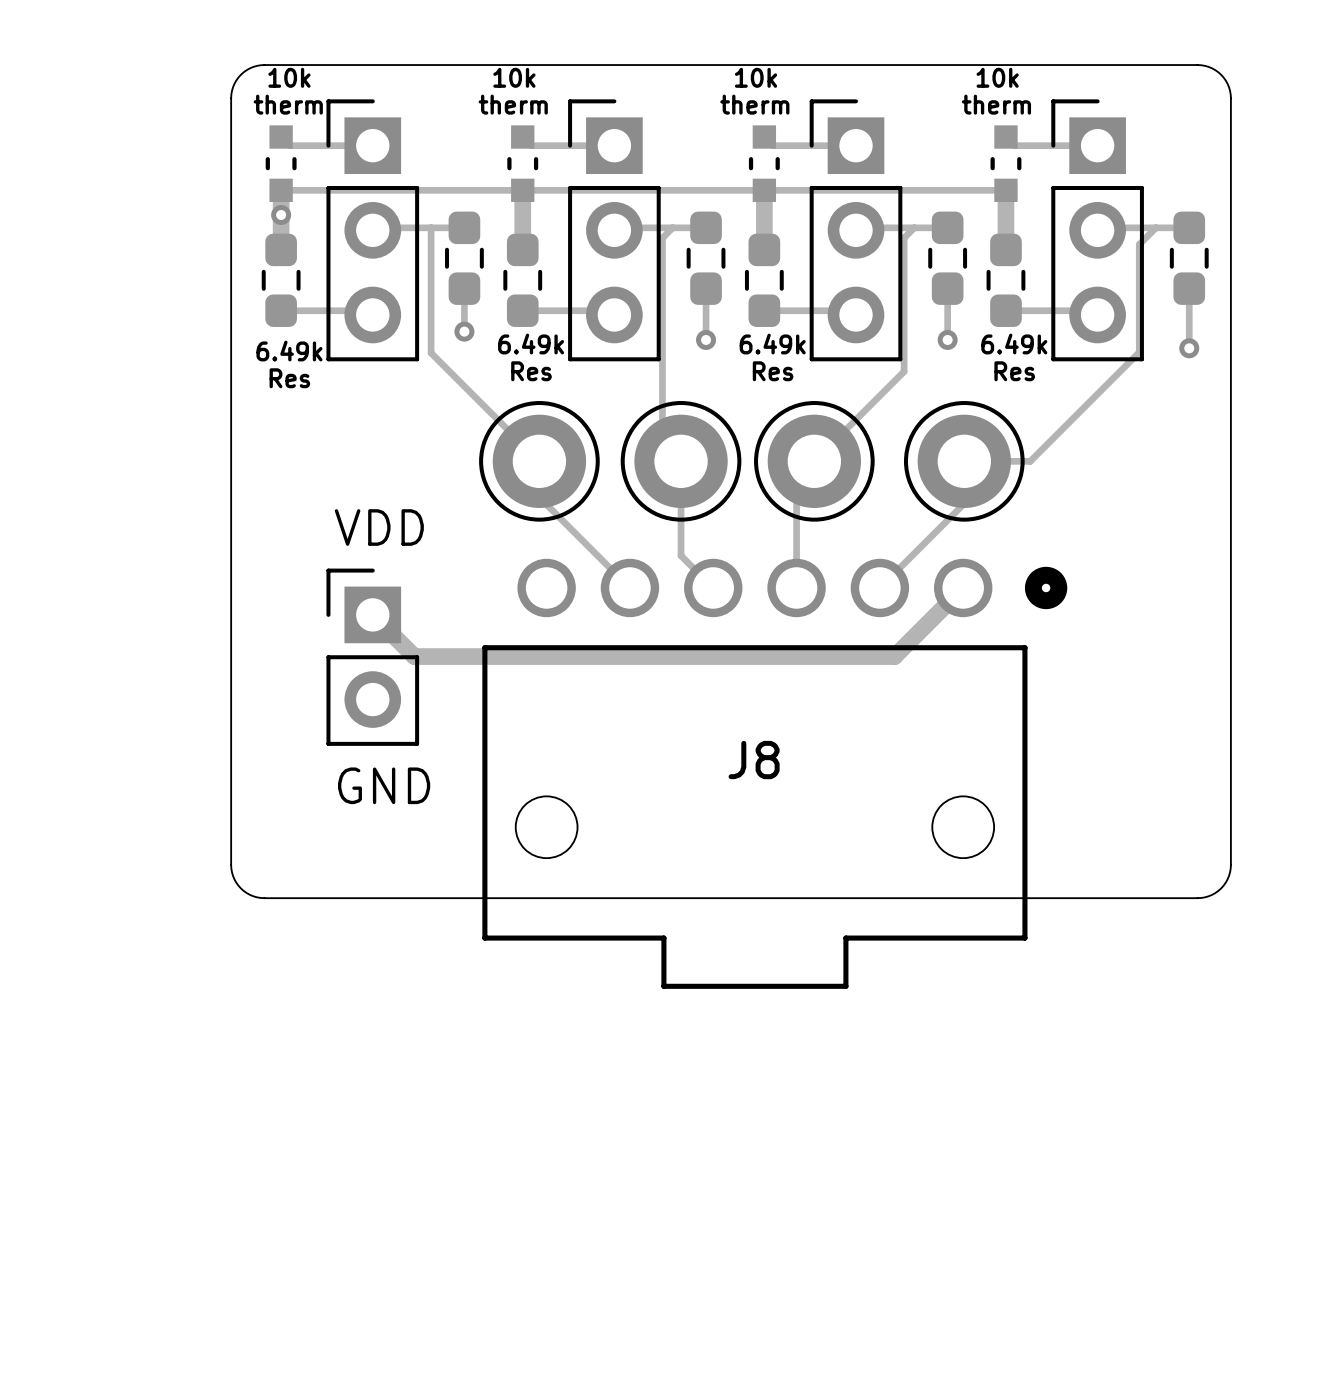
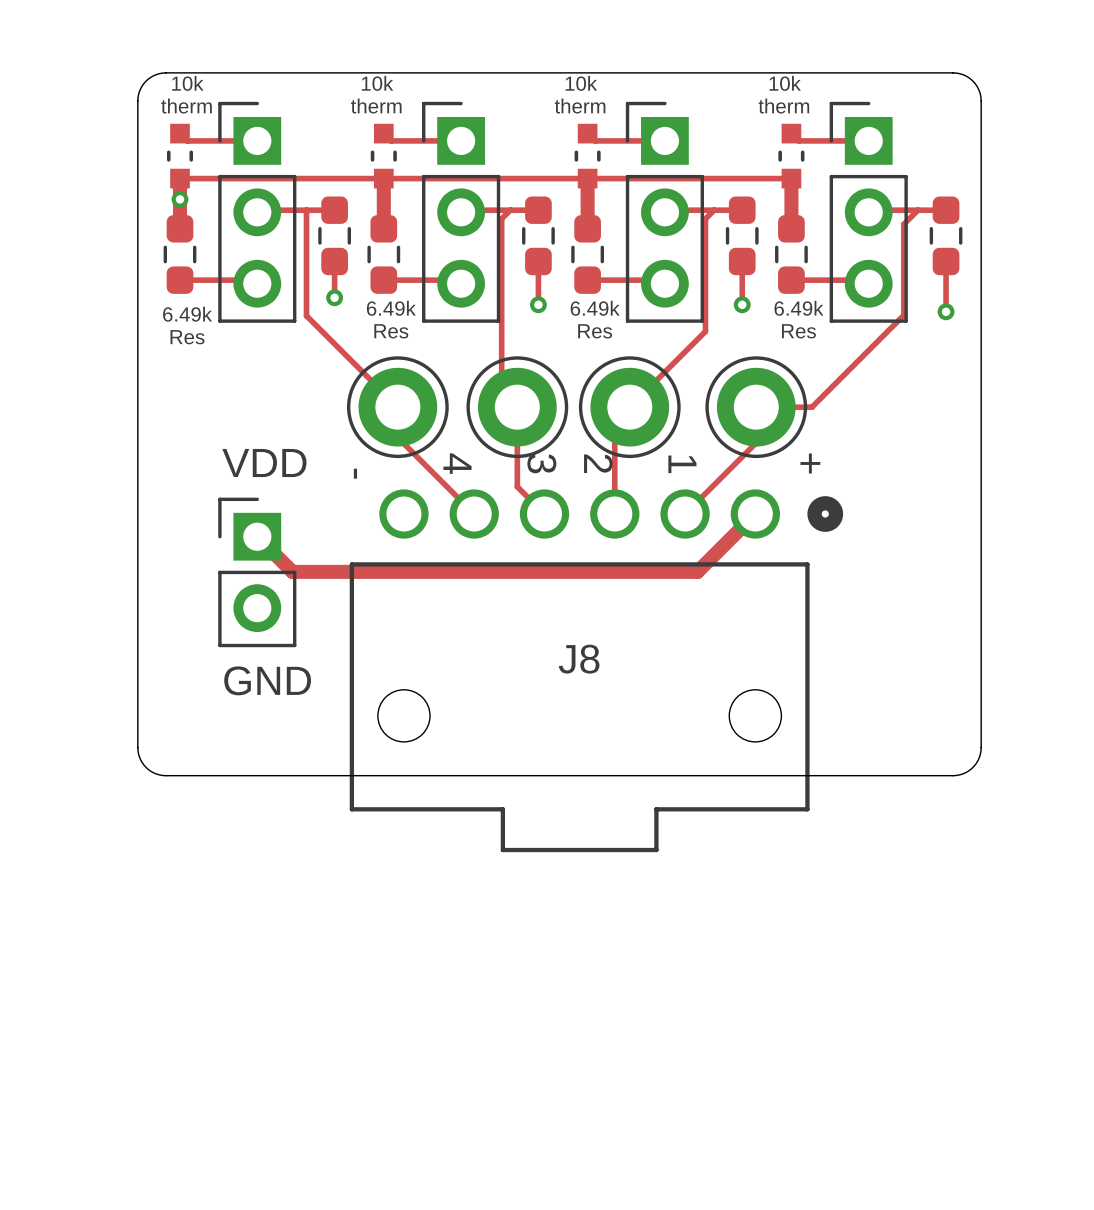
text: none -> - (355, 473)
text: none -> + (810, 463)
text: none -> 3 (541, 463)
text: none -> 2 (598, 463)
text: none -> 4 (457, 463)
text: none -> 1 (682, 464)

